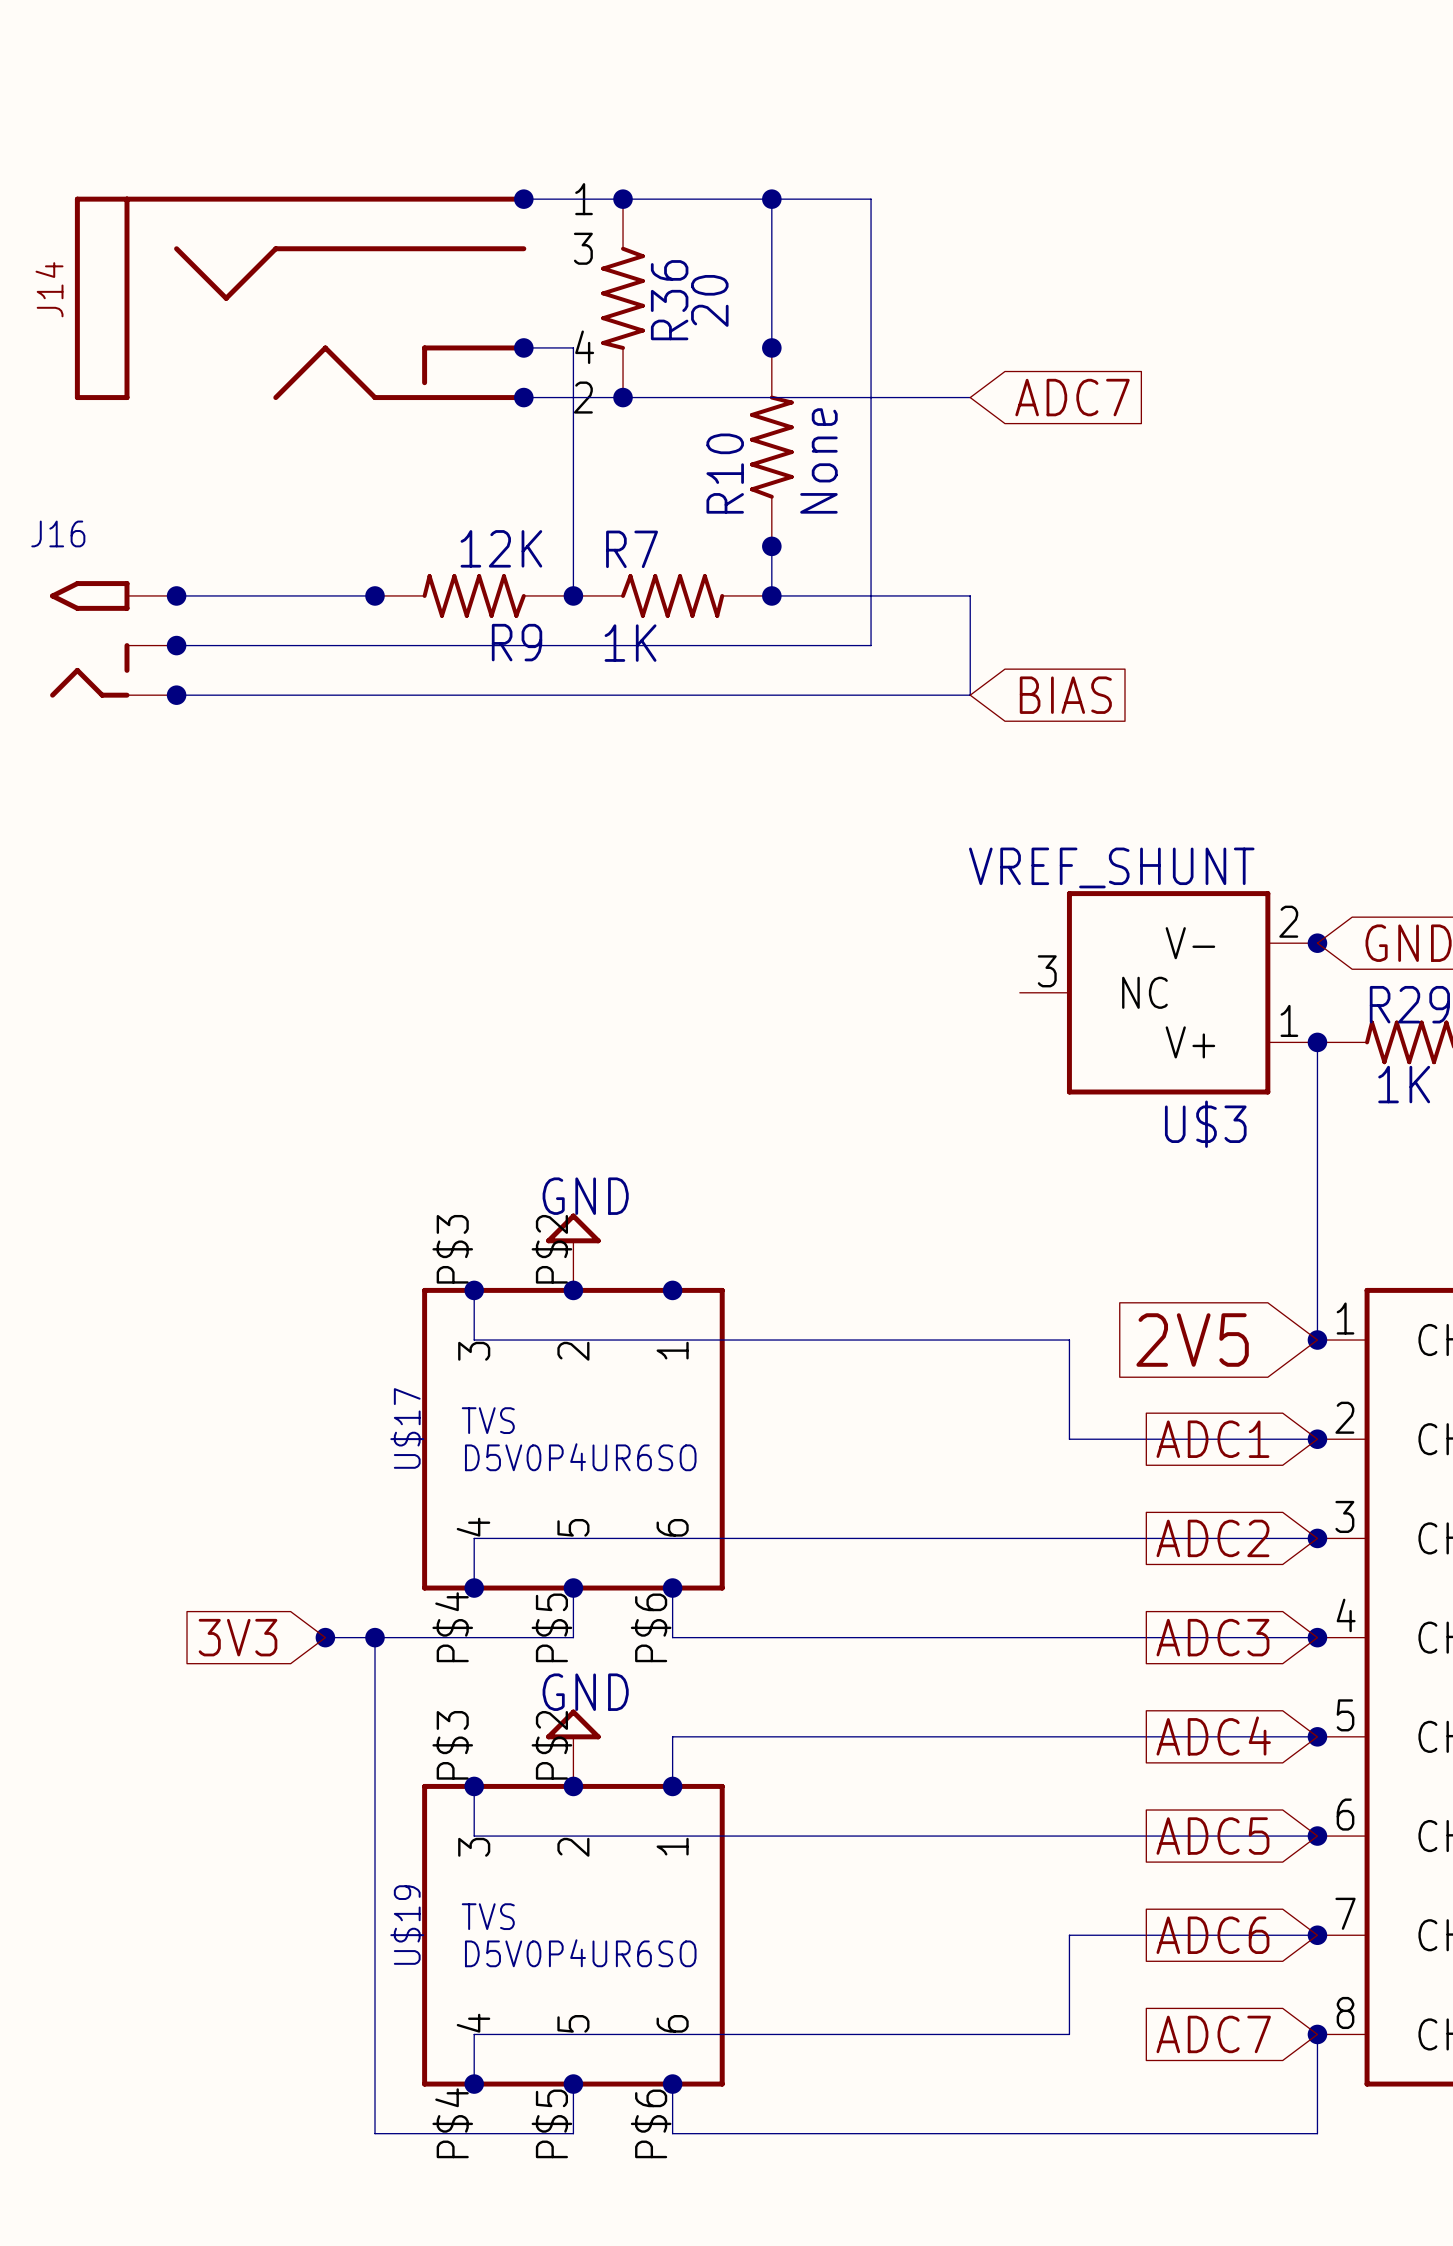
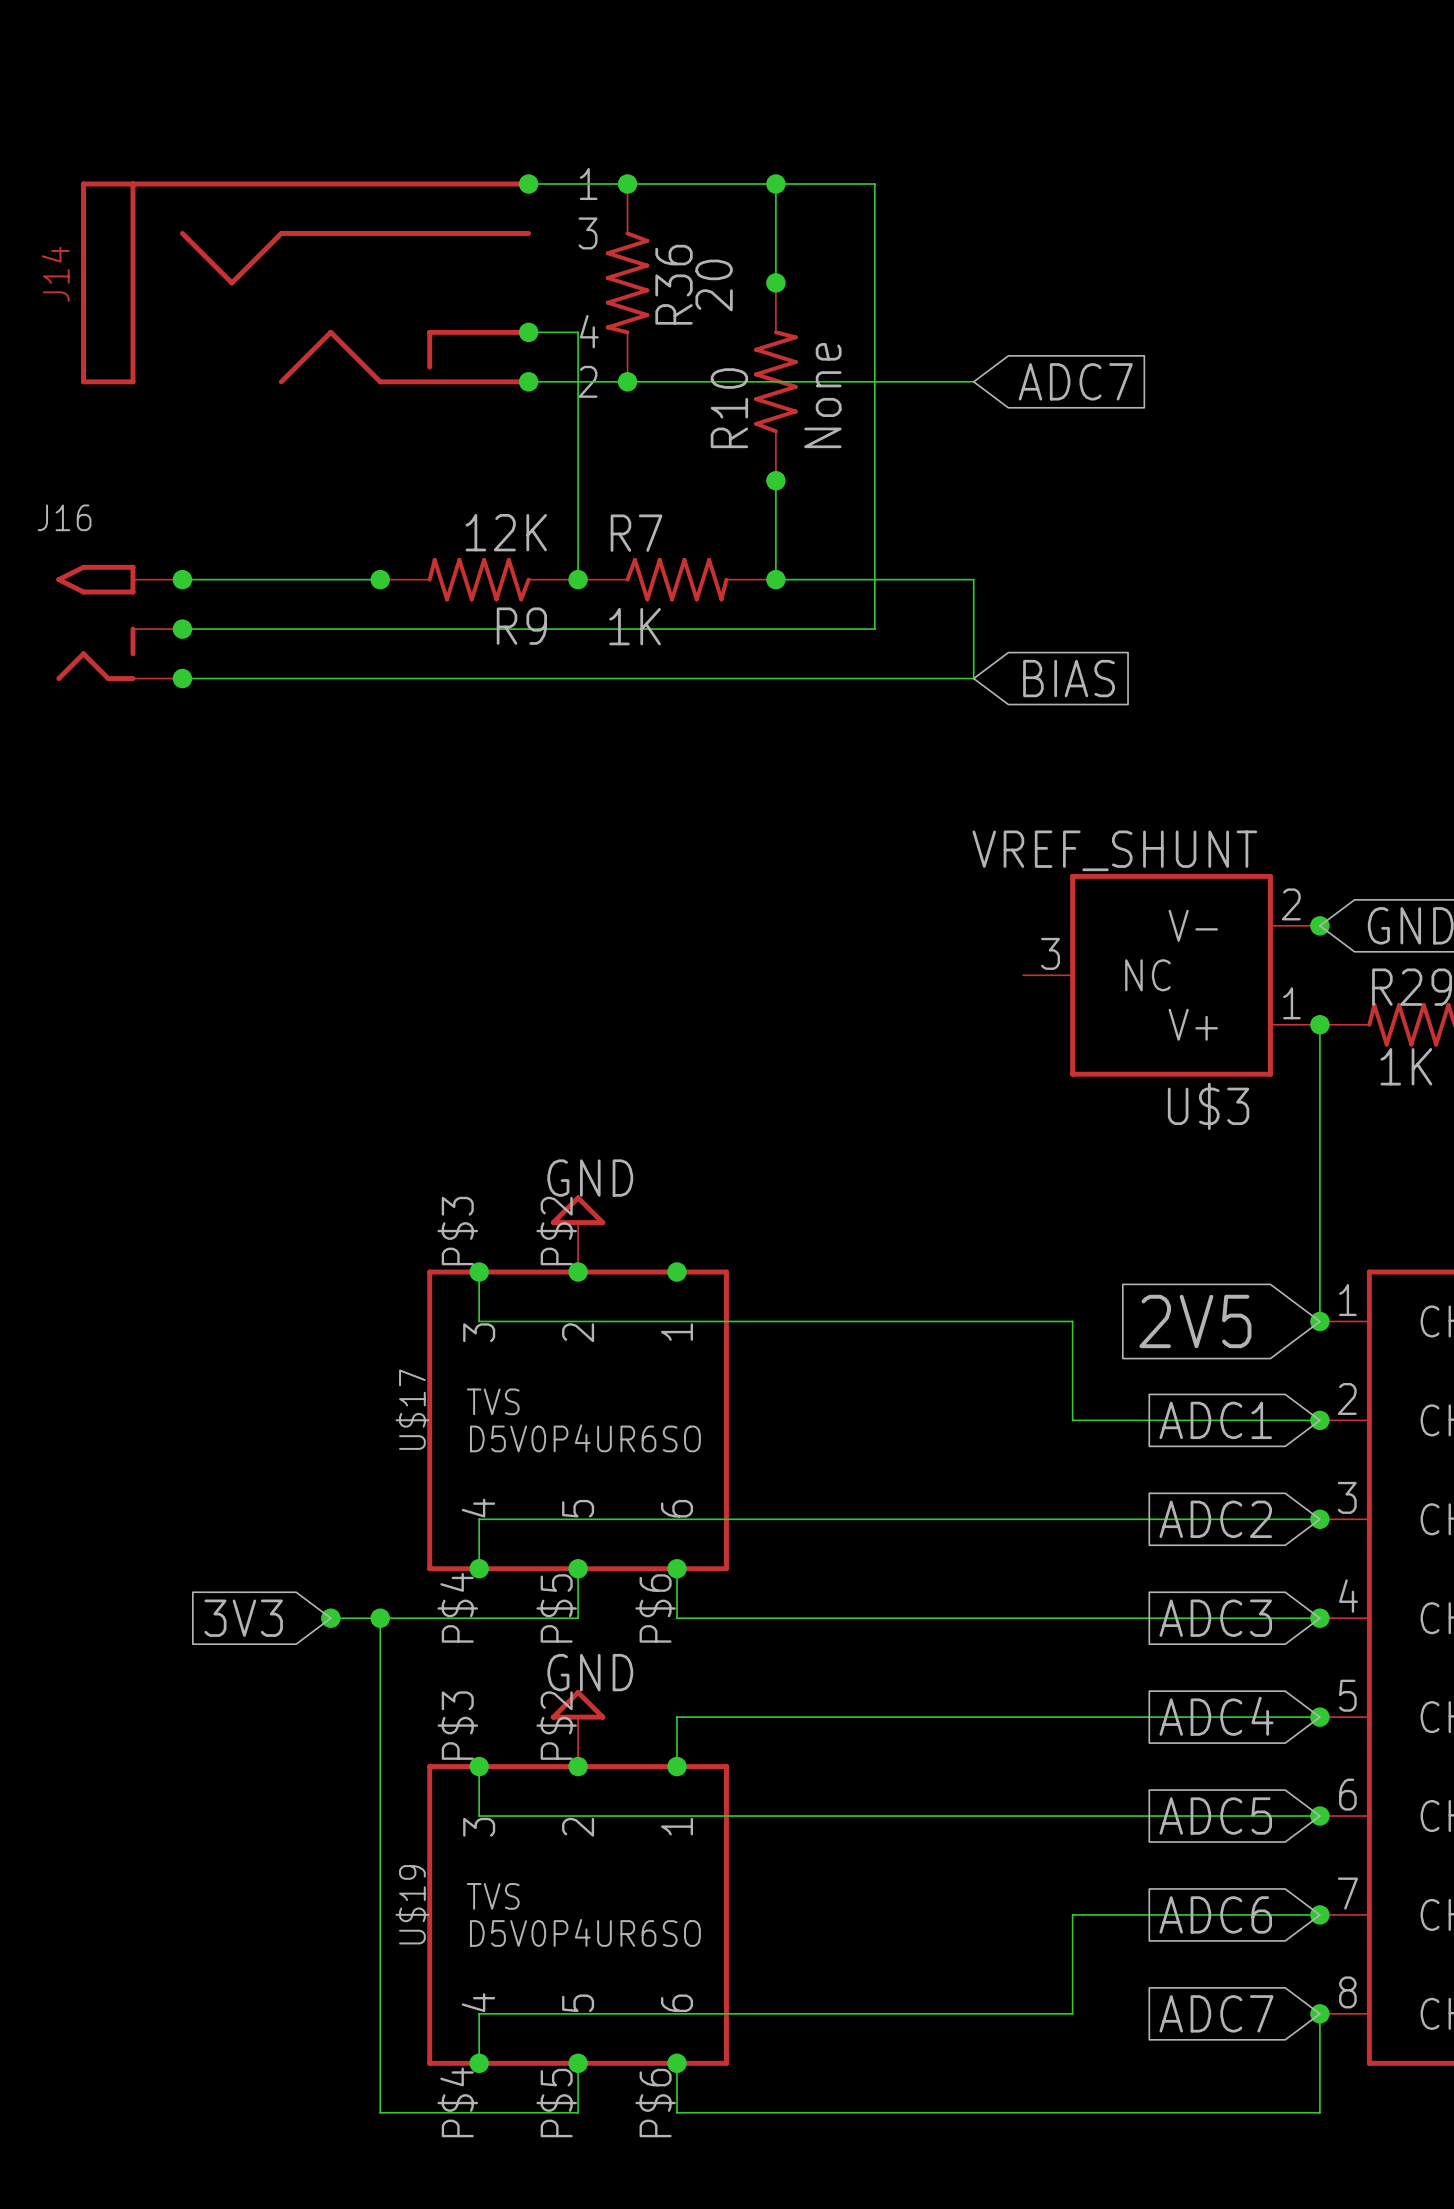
junction position: (771, 347) -> (775, 282)
R10 position: (771, 447) -> (775, 381)
junction position: (771, 546) -> (775, 480)

